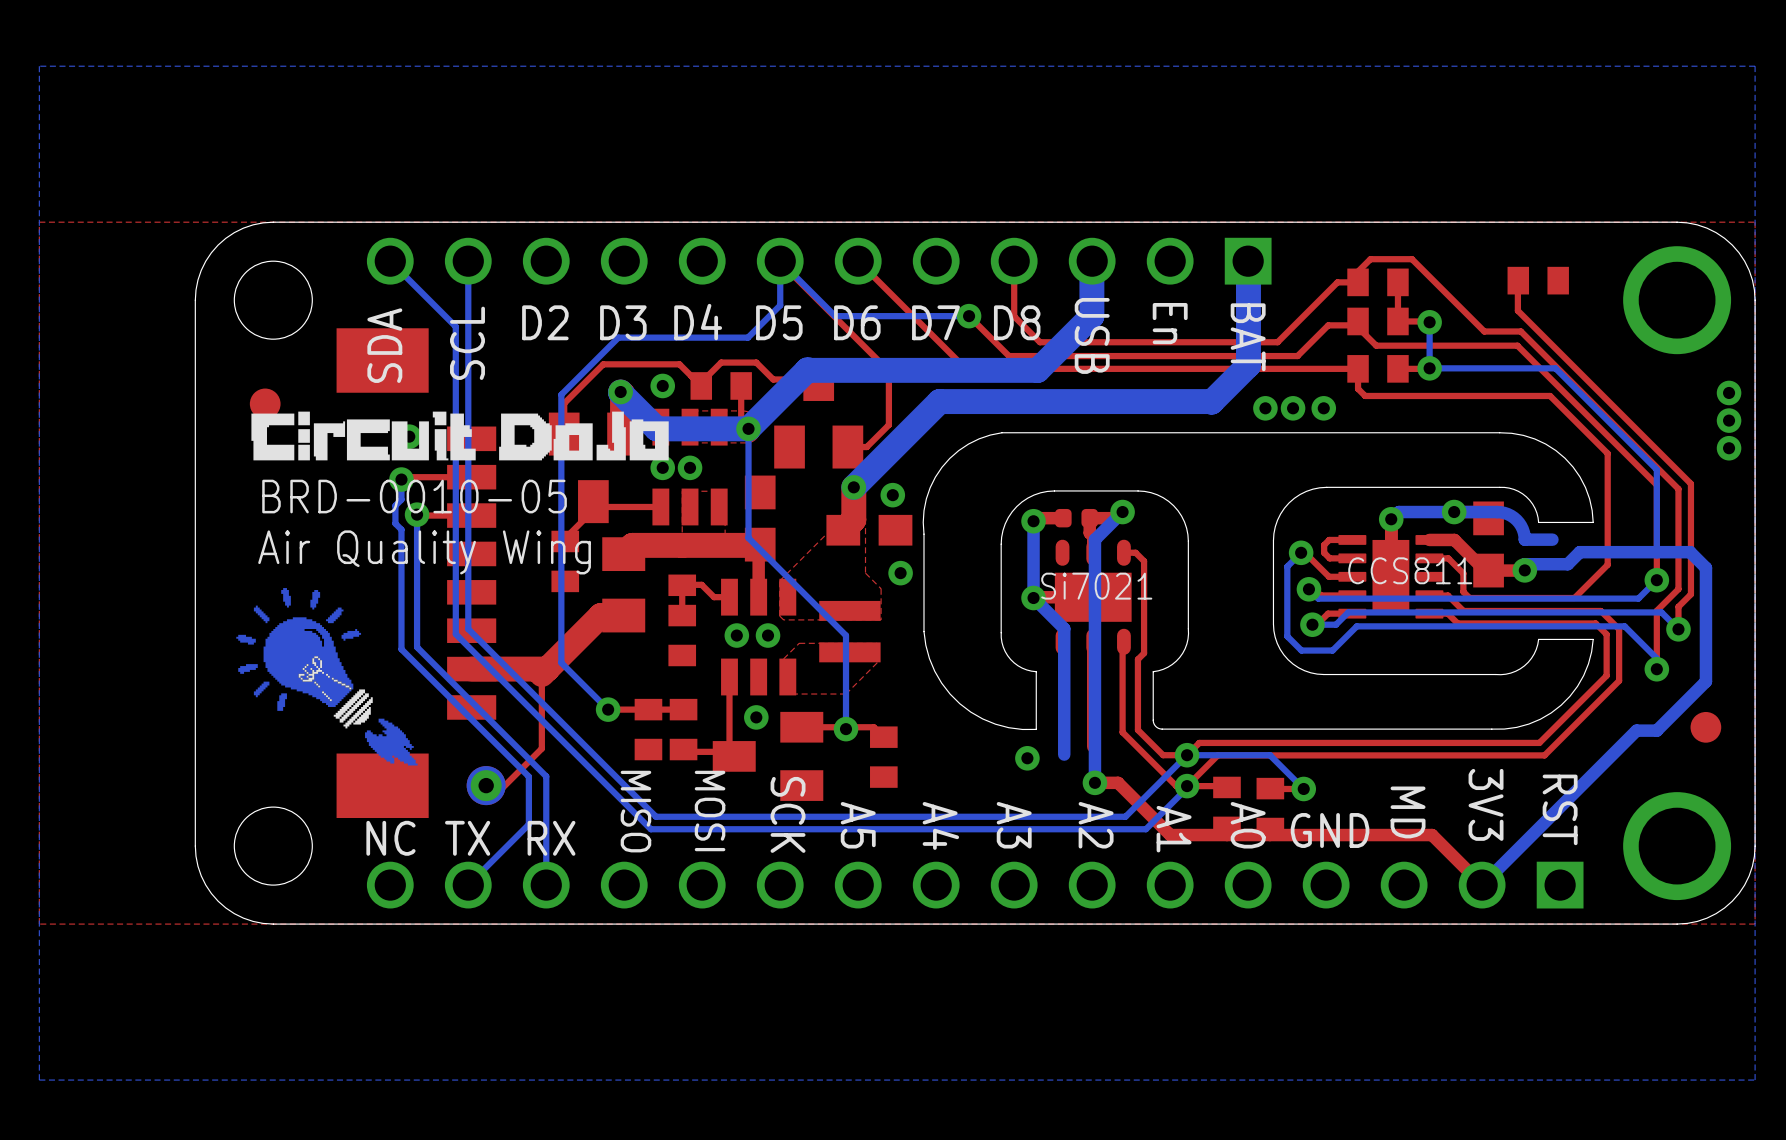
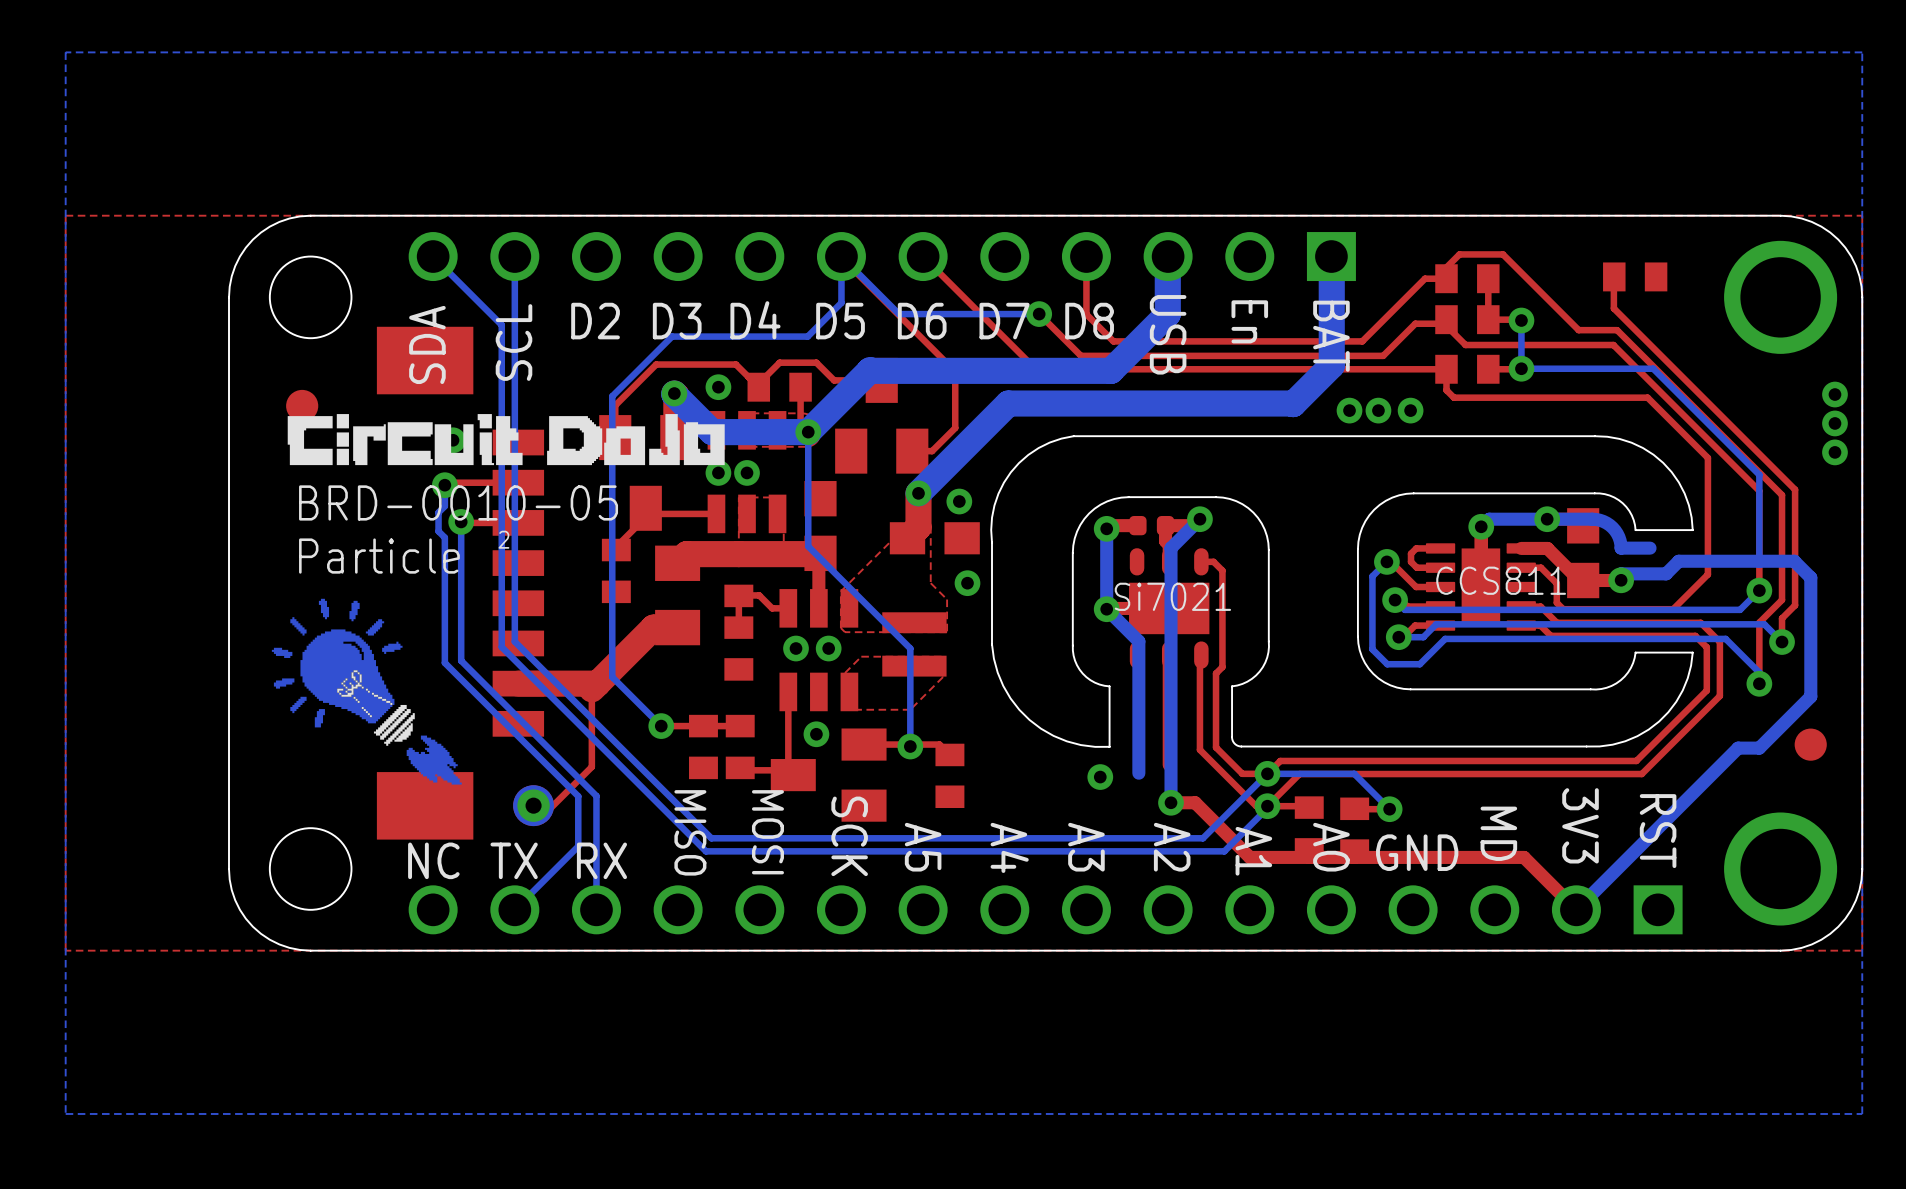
text: none -> 2 (503, 539)
text: Air Quality Wing (424, 552) -> Particle (379, 556)

